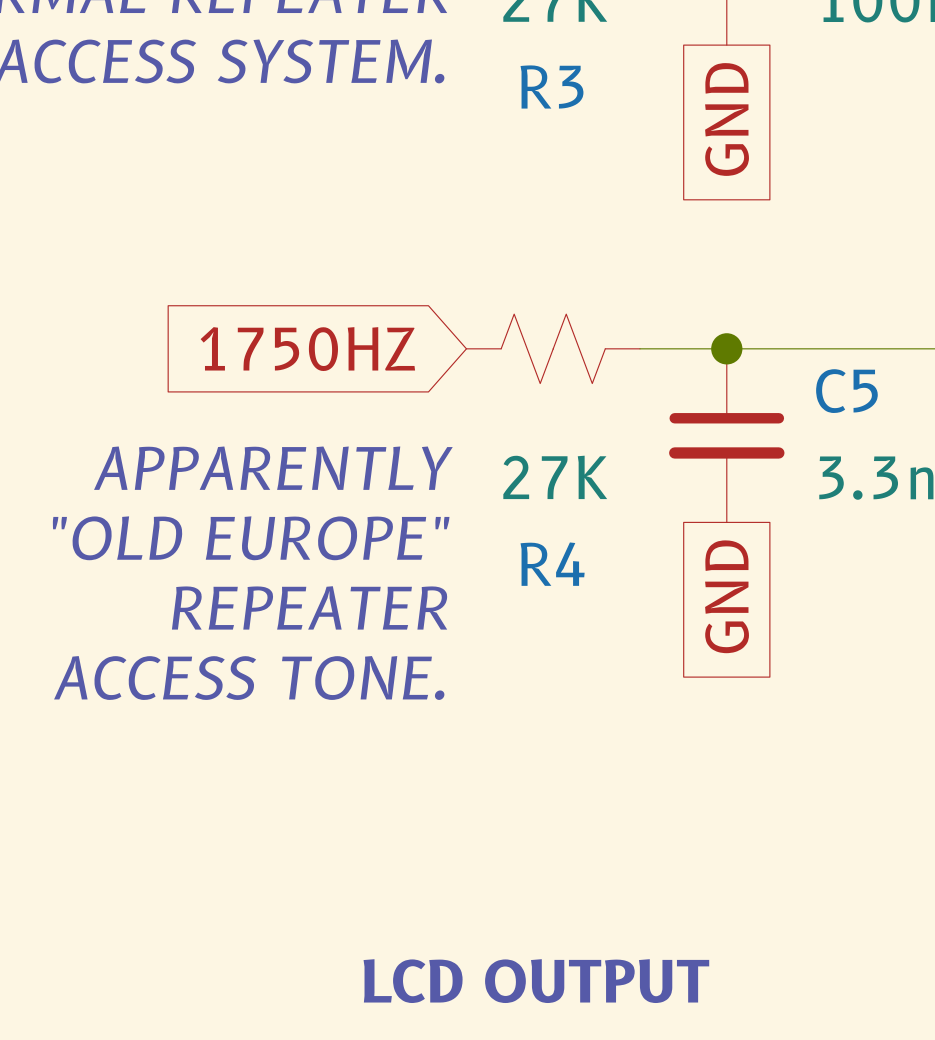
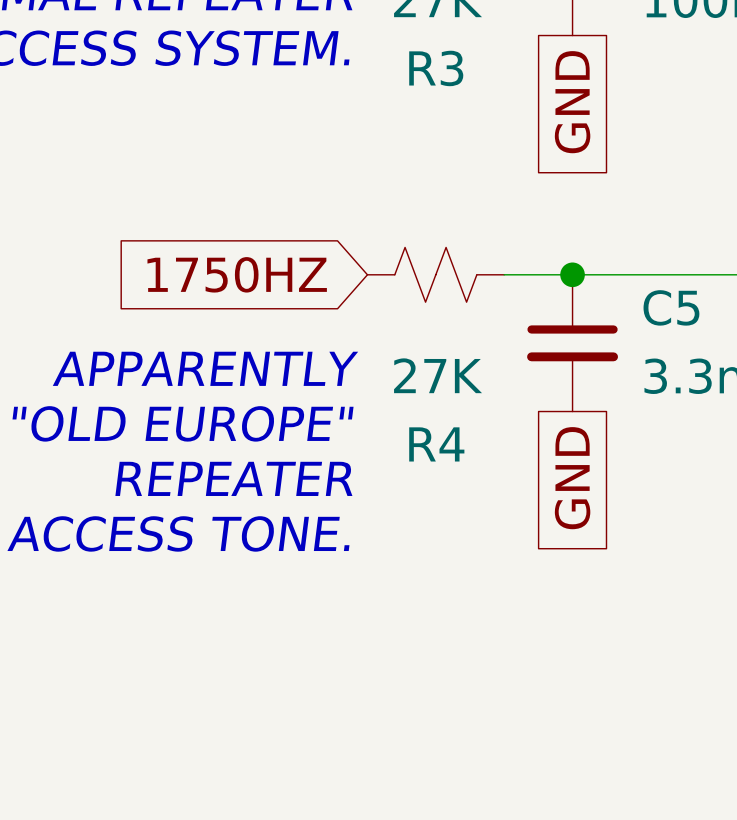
text: LCD OUTPUT (536, 981) -> none

